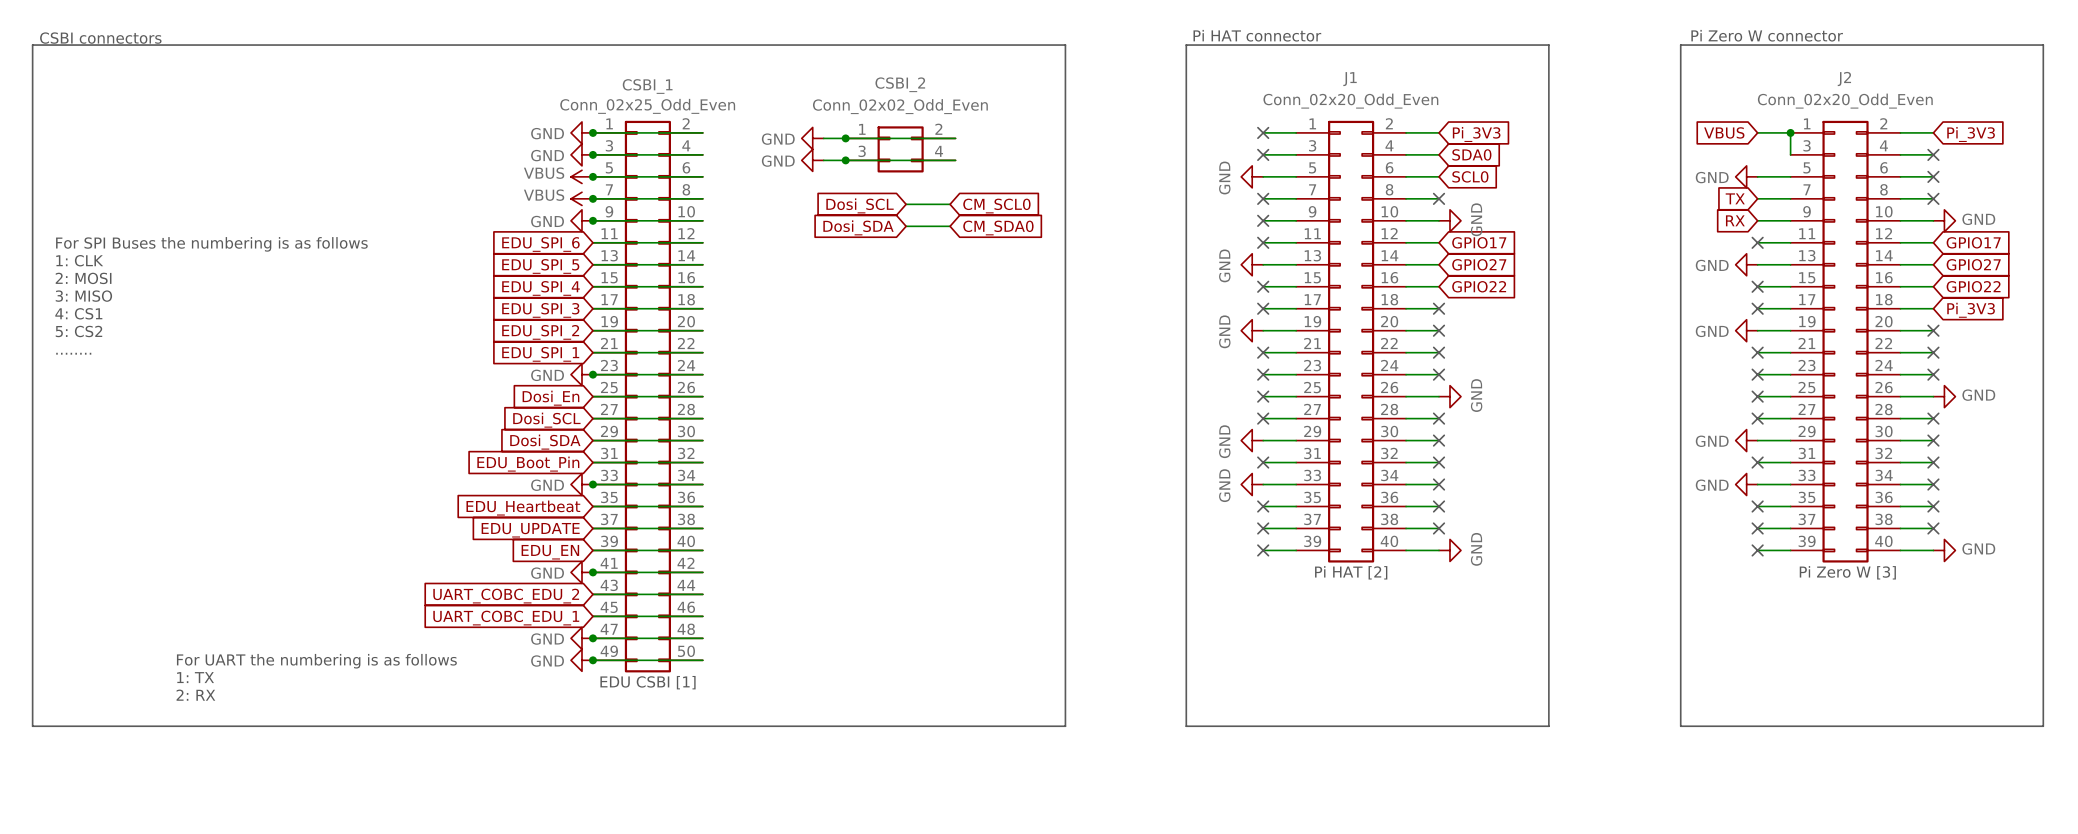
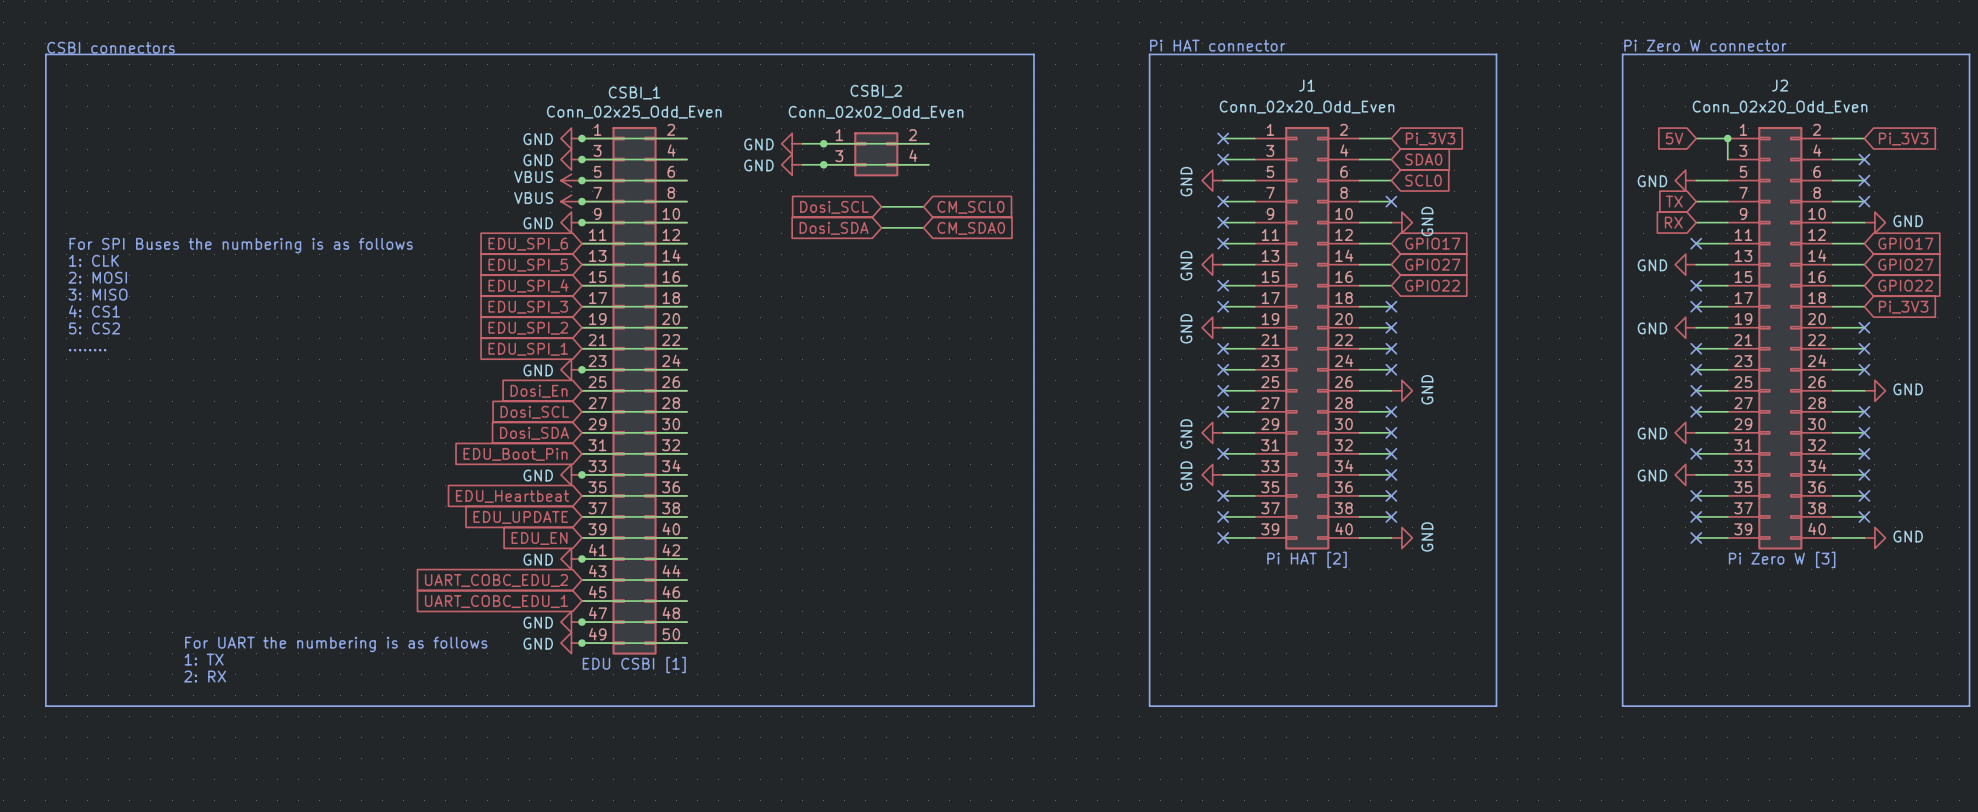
global label: VBUS (1724, 132) -> 5V (1674, 138)

